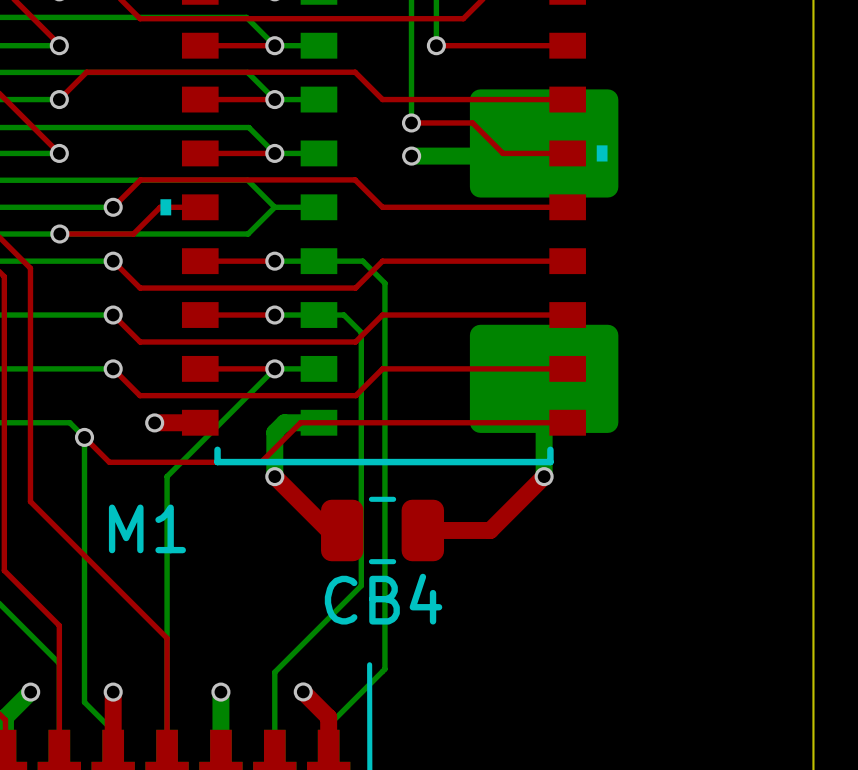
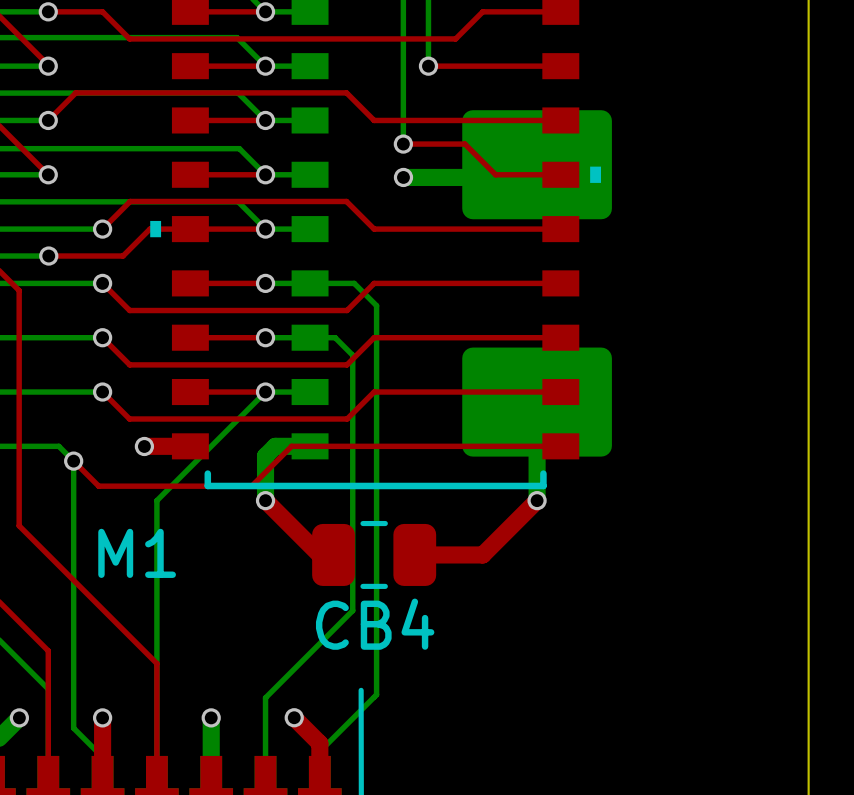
top track: none -> (190, 229) (265, 229)
bottom track: (274, 207) (248, 234) (59, 234) -> none
via: none -> (265, 229)

